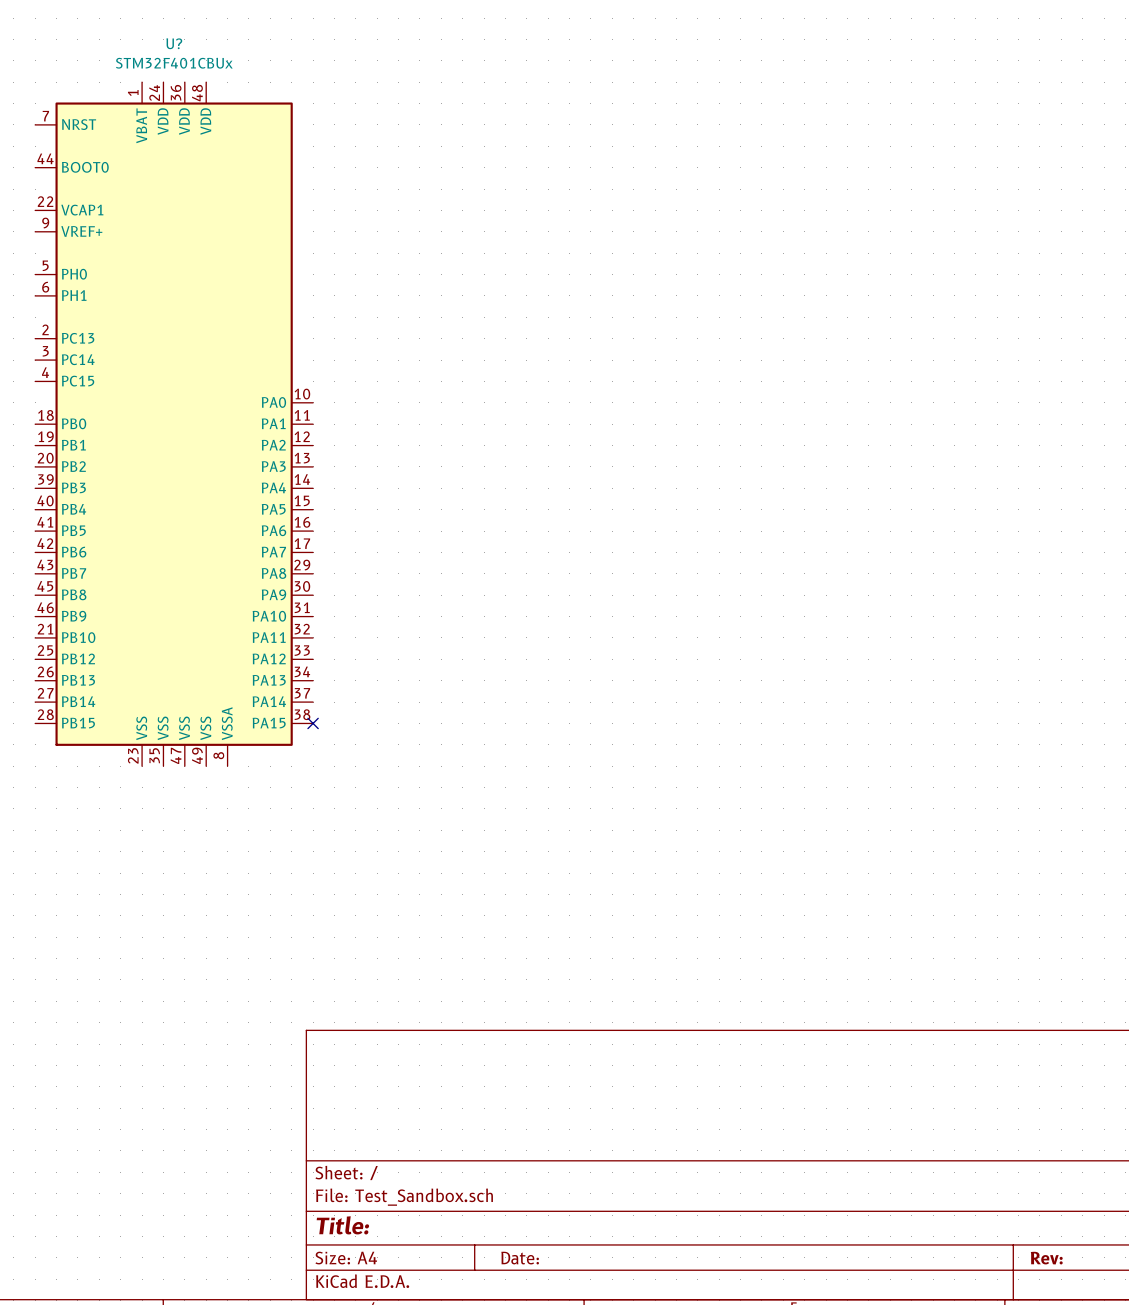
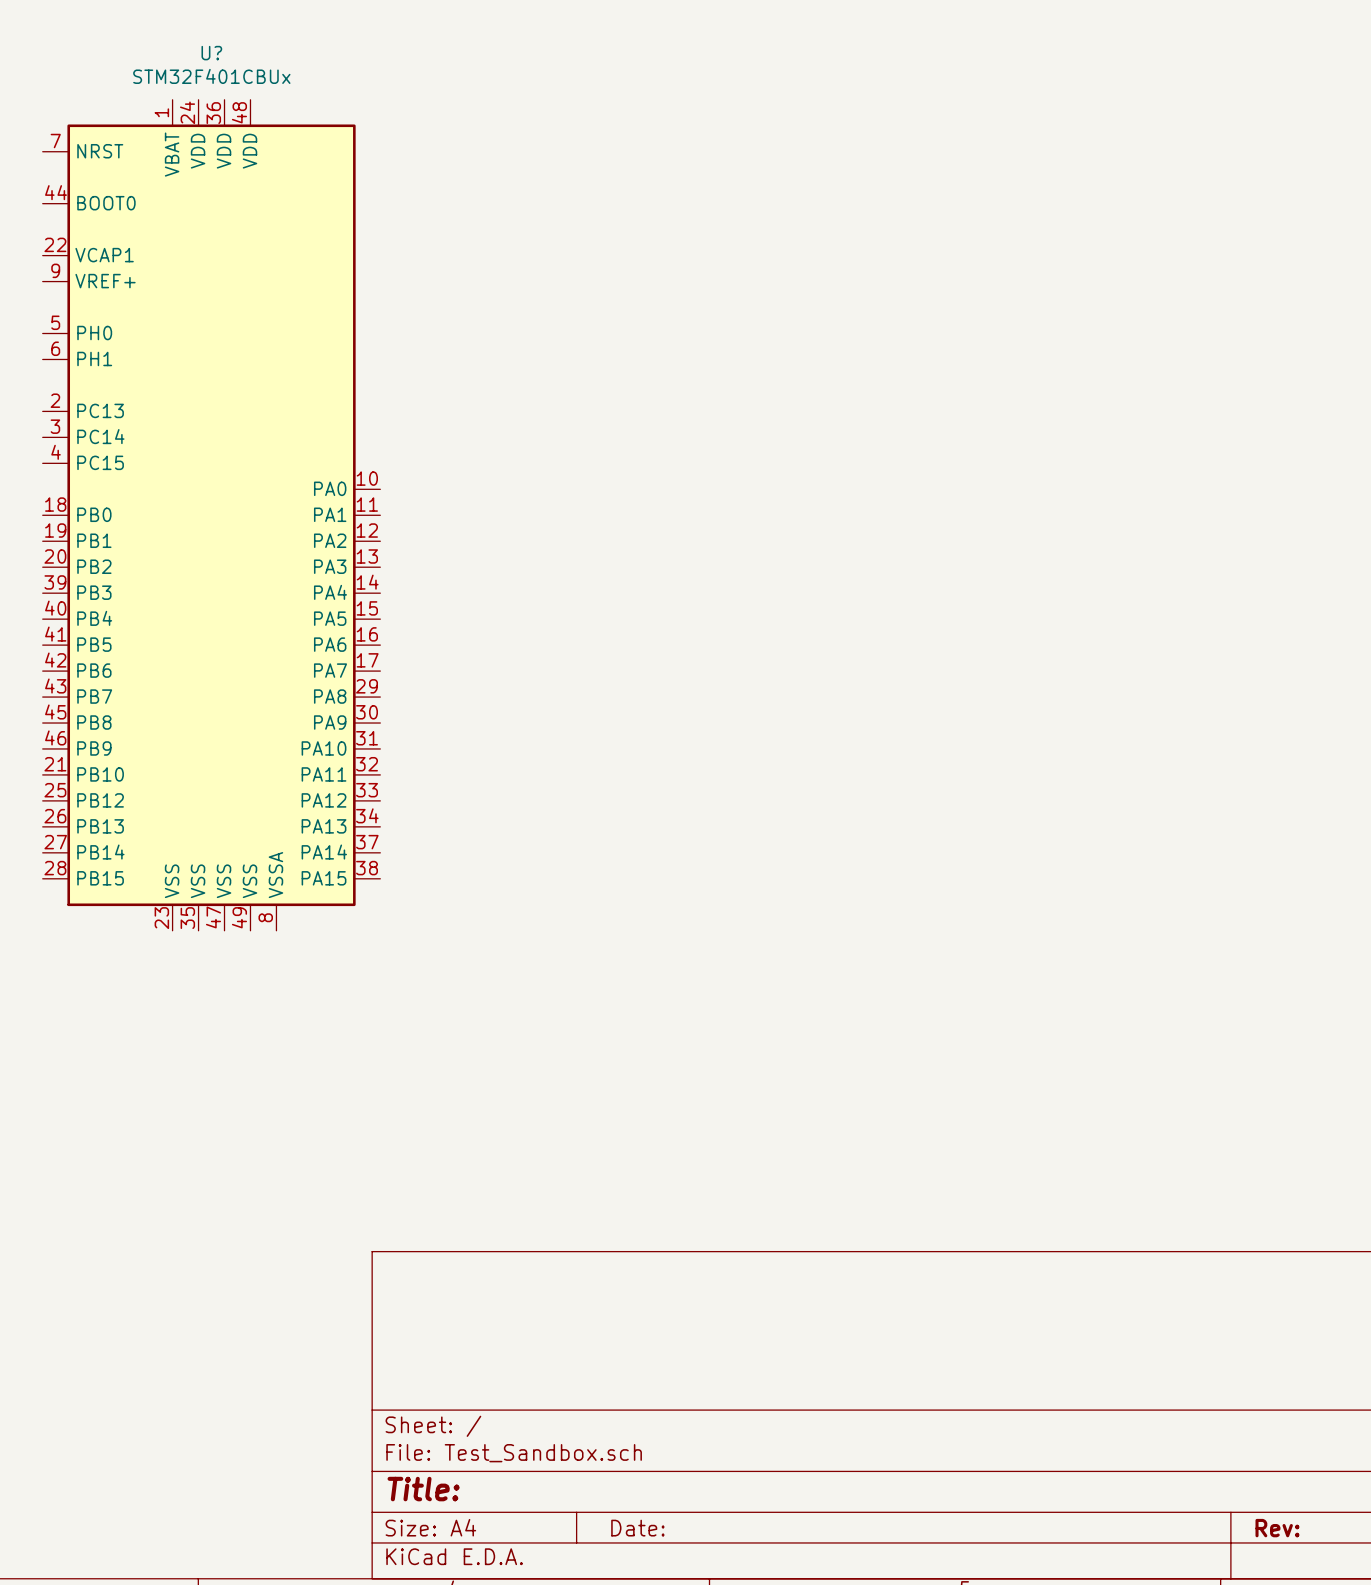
no-connect mark: (313, 723) -> none

